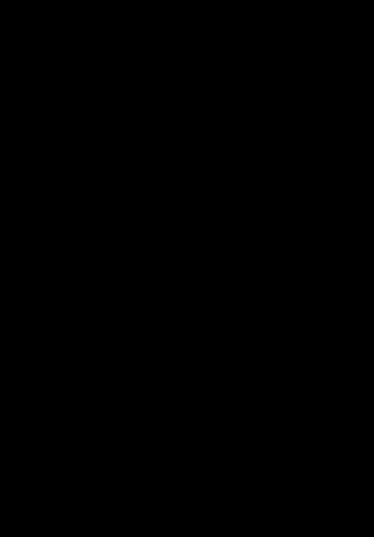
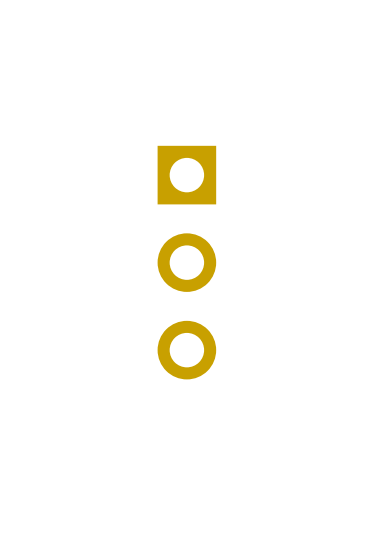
part: none -> (186, 262)

